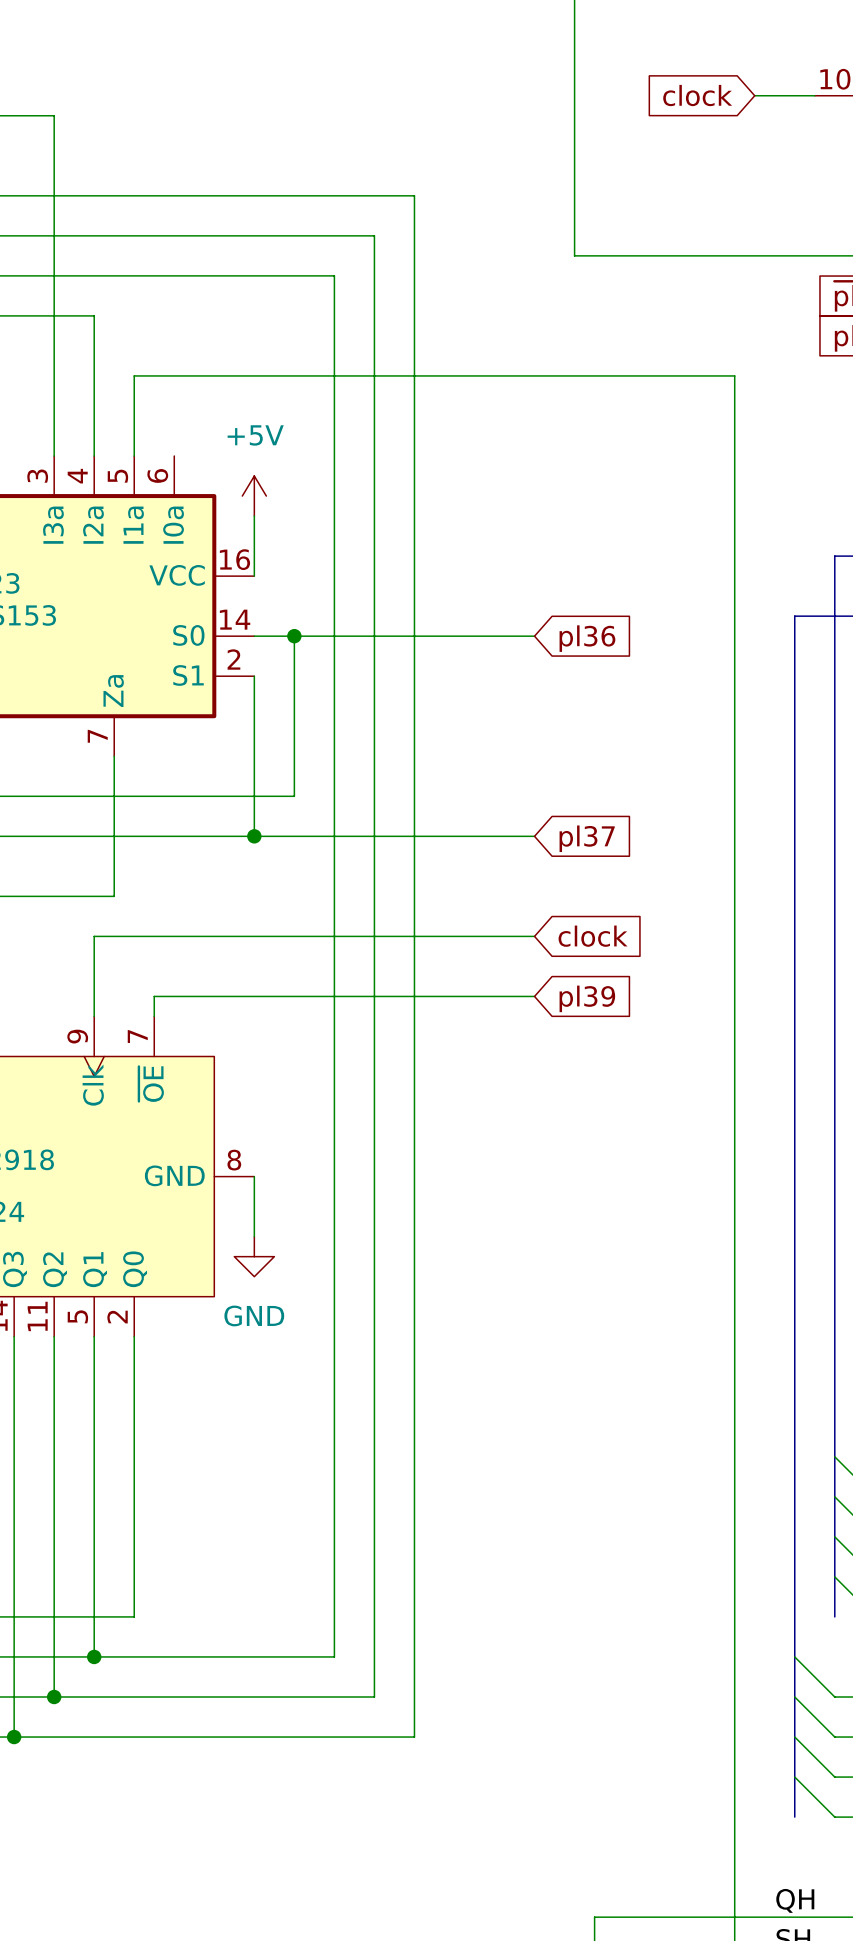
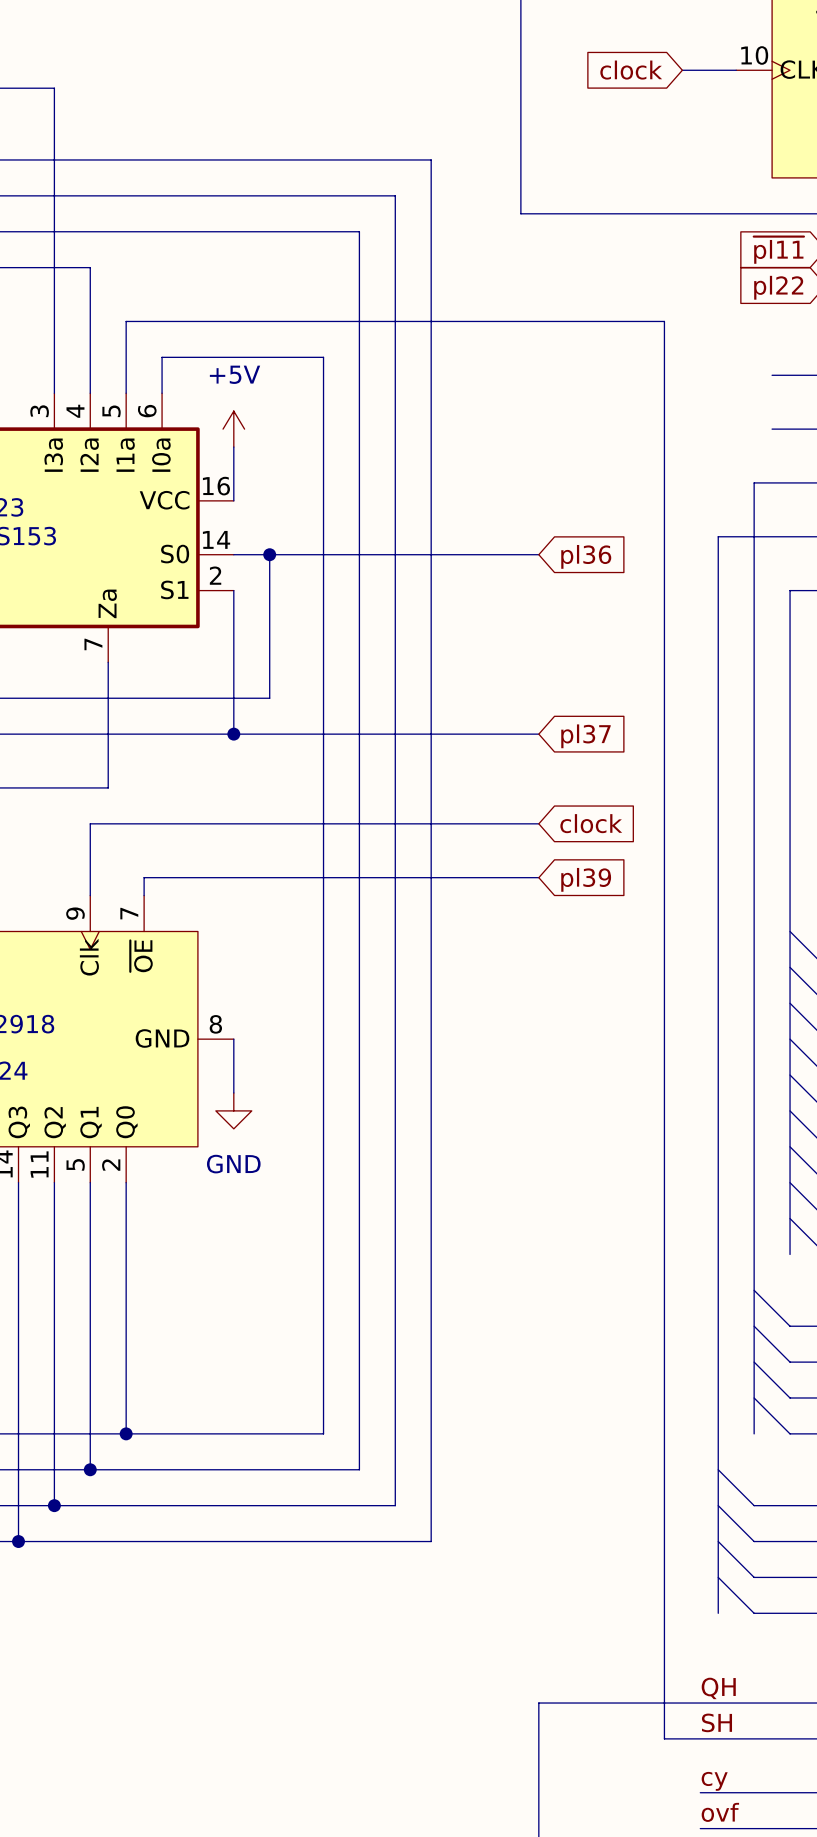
wire: (414, 195) (414, 1737) -> (377, 159) (431, 159) (431, 1541) (377, 1541)
wire: (374, 235) (374, 1697) -> (341, 195) (395, 195) (395, 1505) (341, 1505)
wire: (334, 275) (334, 1656) -> (305, 231) (359, 231) (359, 1469) (305, 1469)
wire: none -> (162, 393) (162, 357) (323, 357) (323, 1433) (126, 1433)
wire: none -> (485, 554) (538, 554)
global label position: pl36 (587, 638) -> pl36 (586, 556)
wire: none -> (485, 734) (538, 734)
global label position: pl37 (587, 838) -> pl37 (585, 736)
wire: none -> (485, 823) (538, 823)
global label position: clock (593, 936) -> clock (591, 823)
wire: none -> (485, 877) (538, 877)
global label position: pl39 (587, 998) -> pl39 (586, 879)
junction: none -> (126, 1433)

